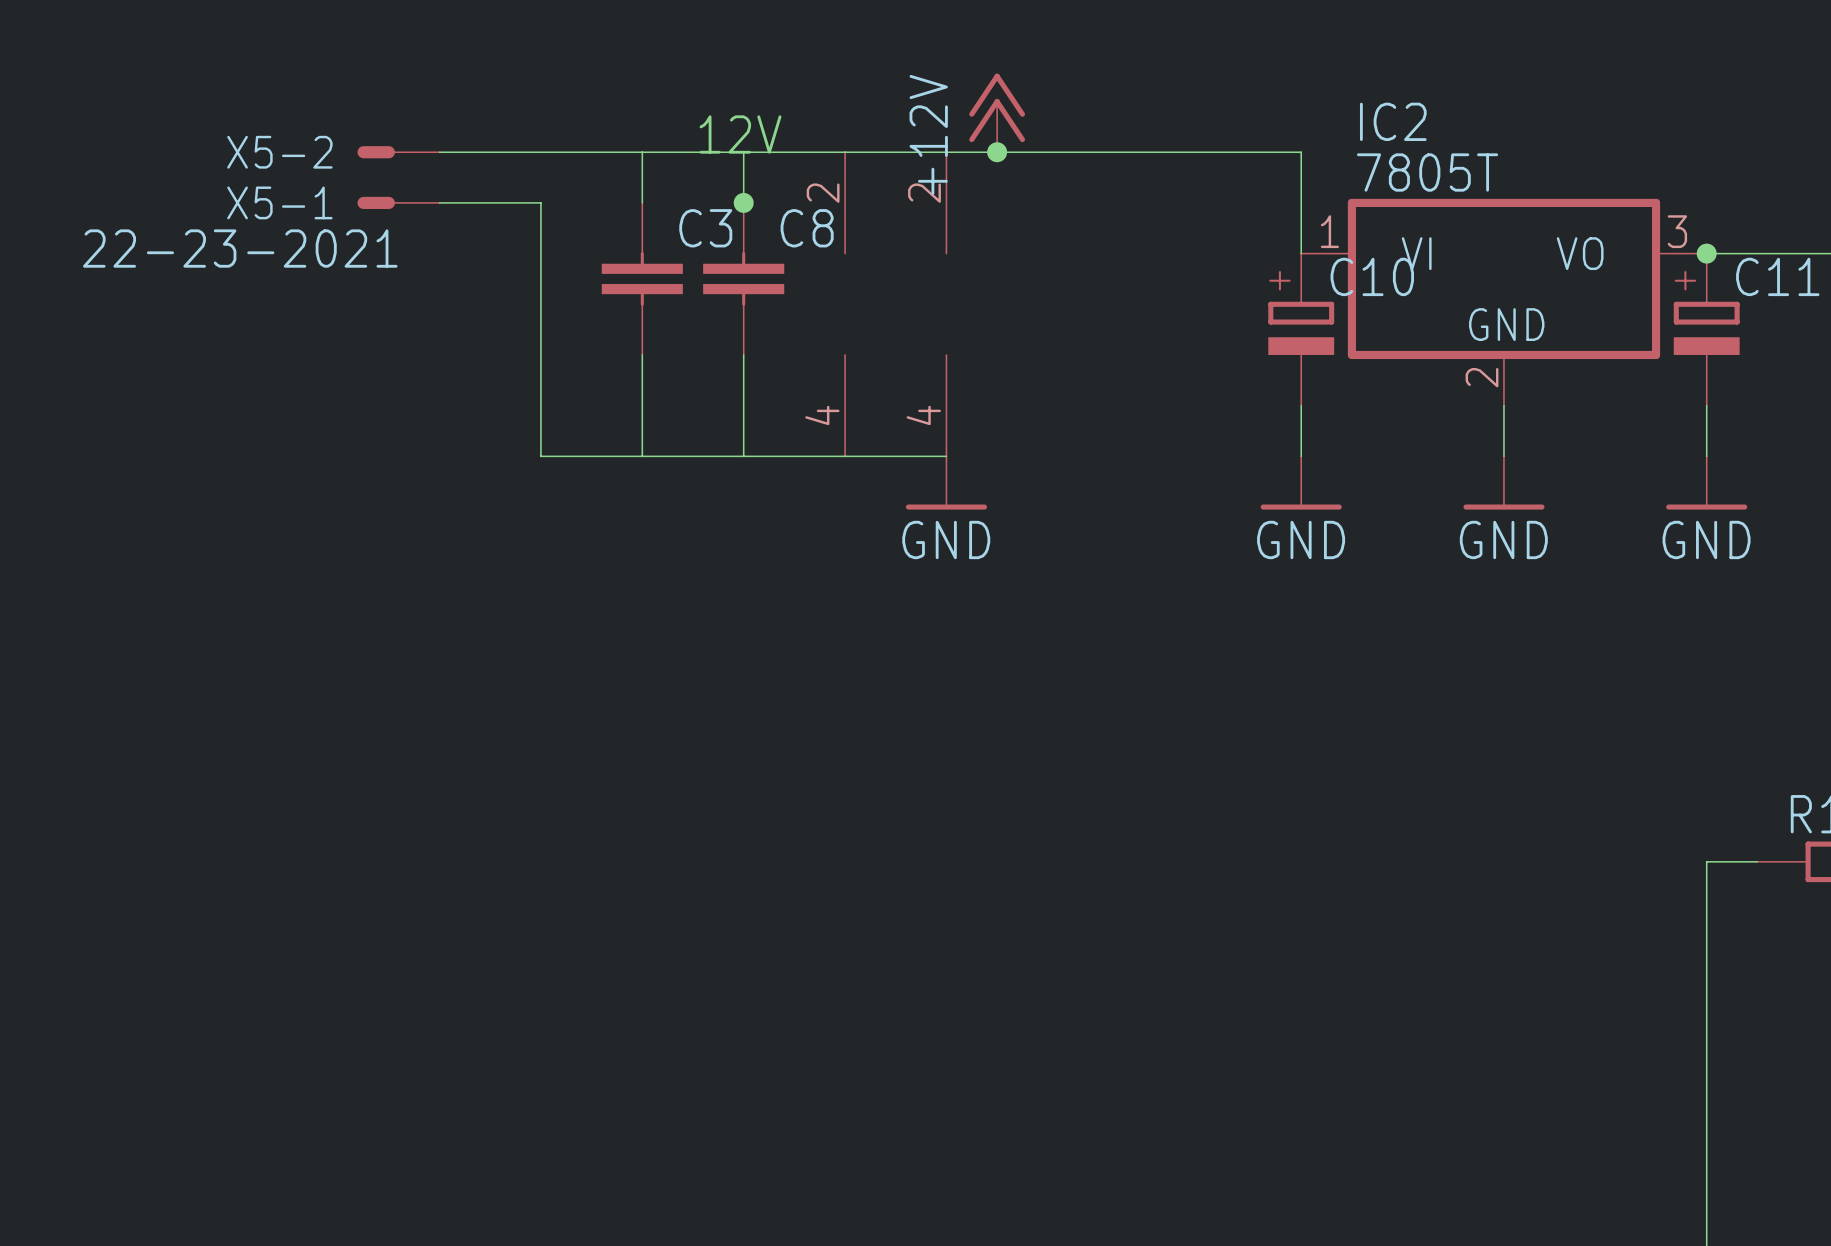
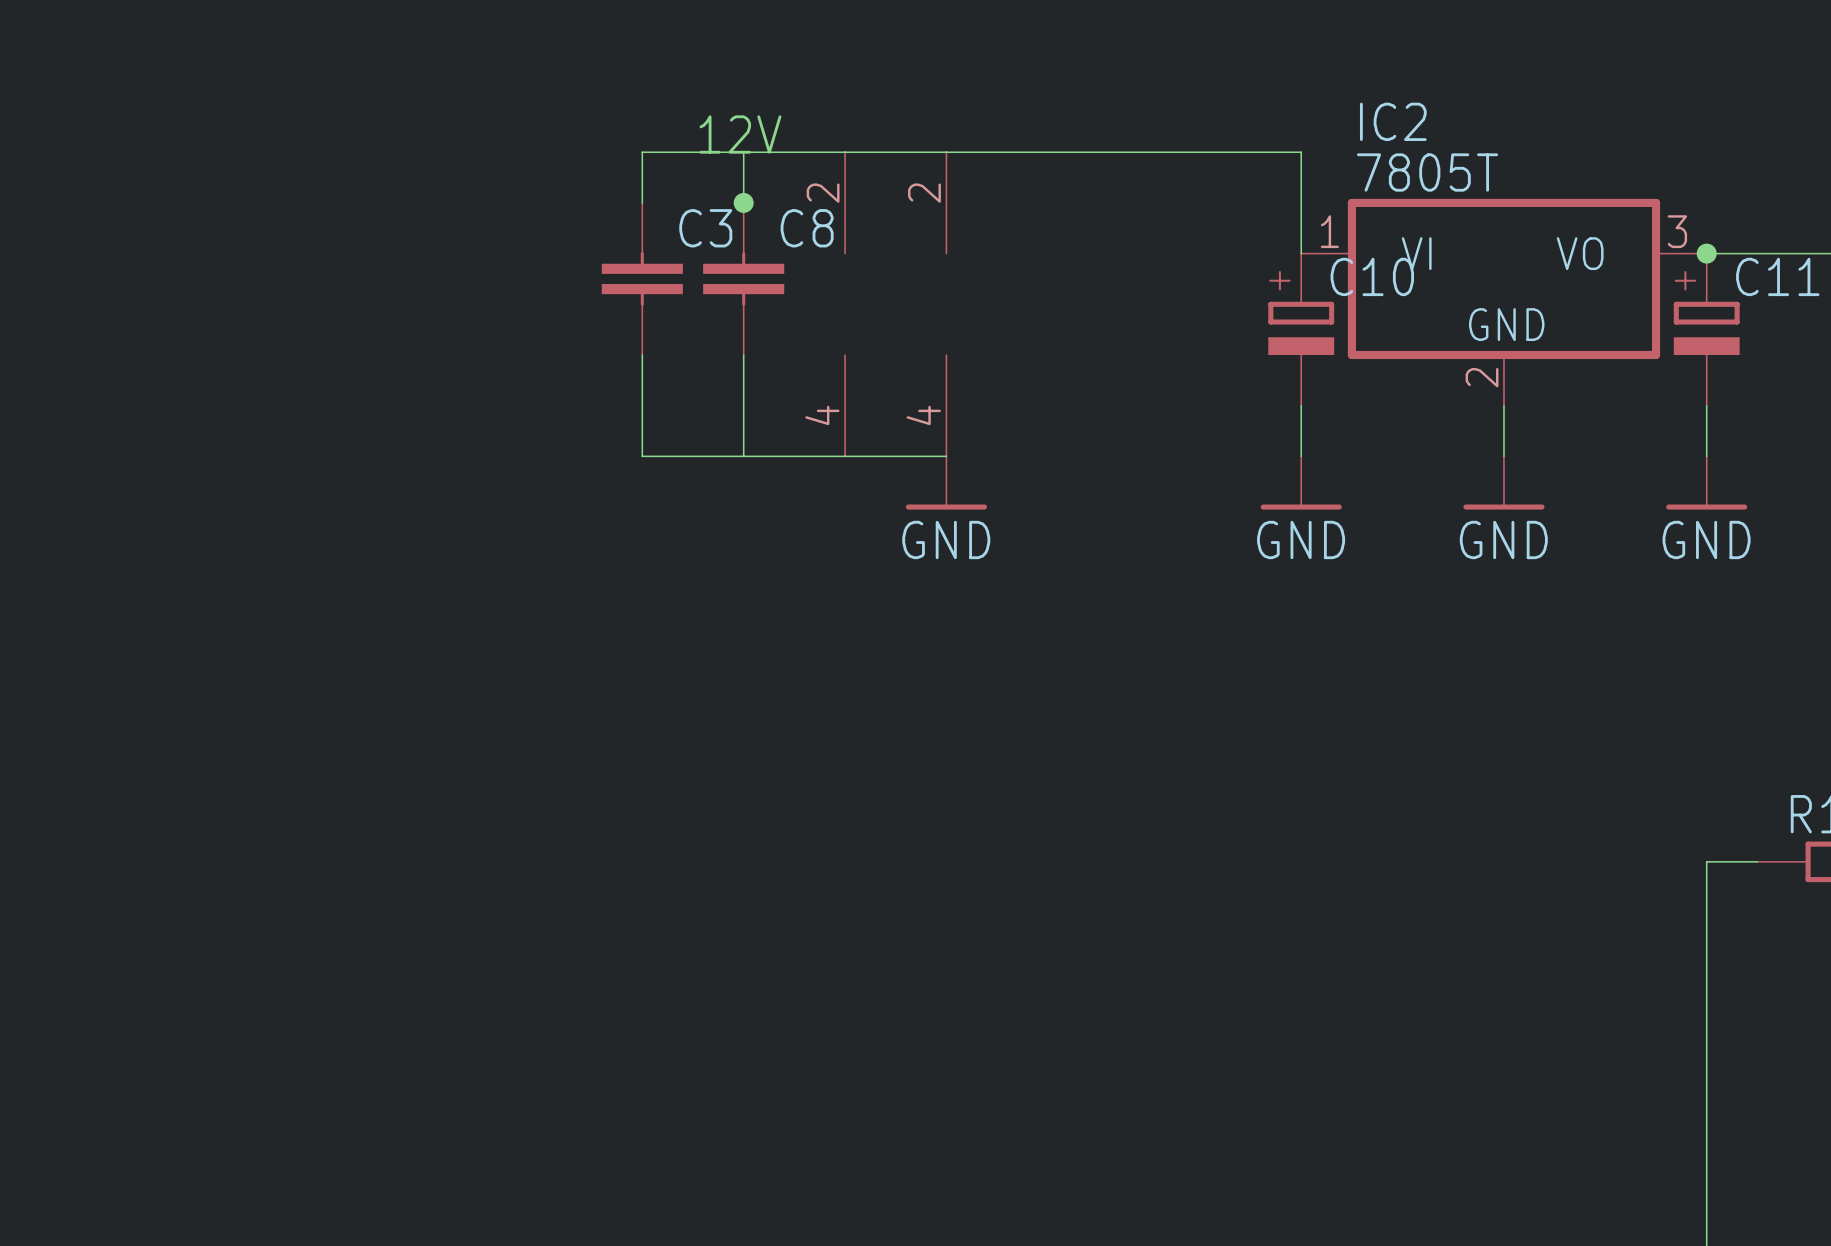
power symbol: +12V (997, 112) -> none
X5-2: (398, 152) -> none
wire: (439, 152) (642, 152) -> none
junction: (997, 152) -> none
X5-1: 22-23-2021 (398, 202) -> none
wire: (439, 202) (540, 202) (540, 456) (642, 456) -> none

